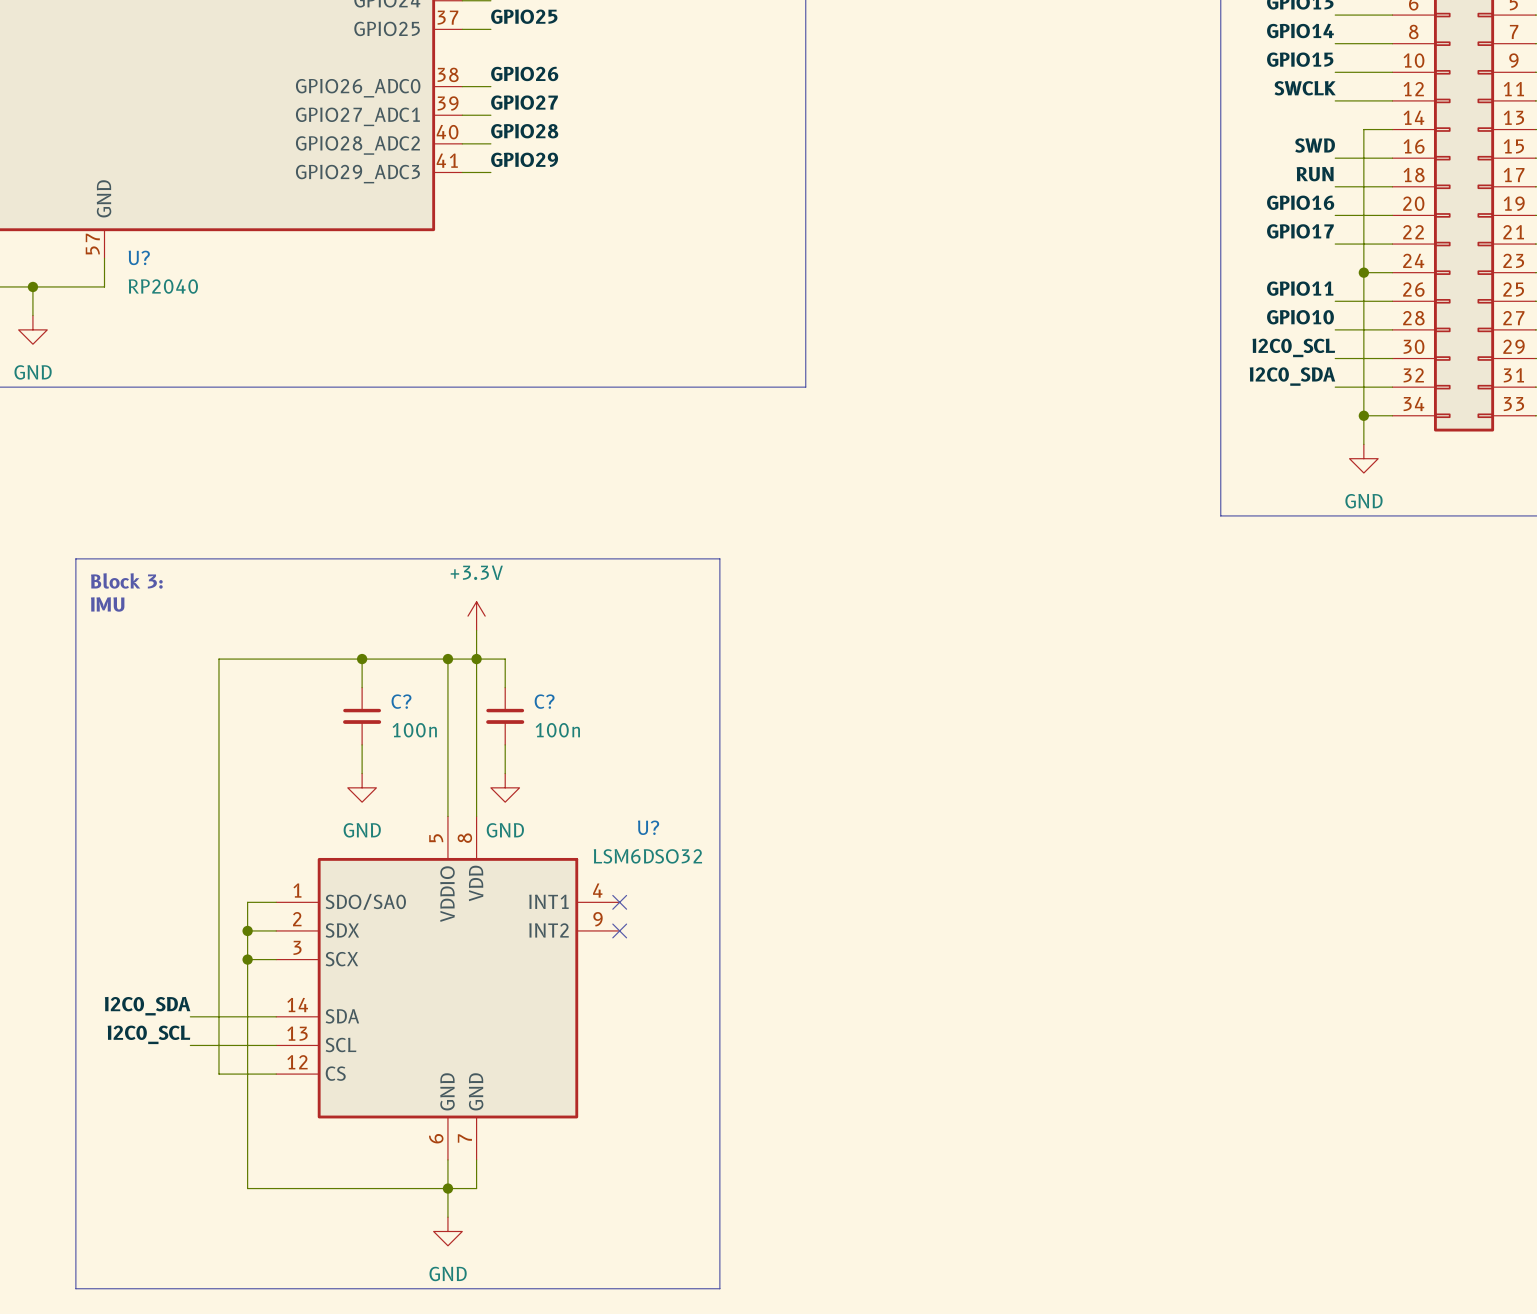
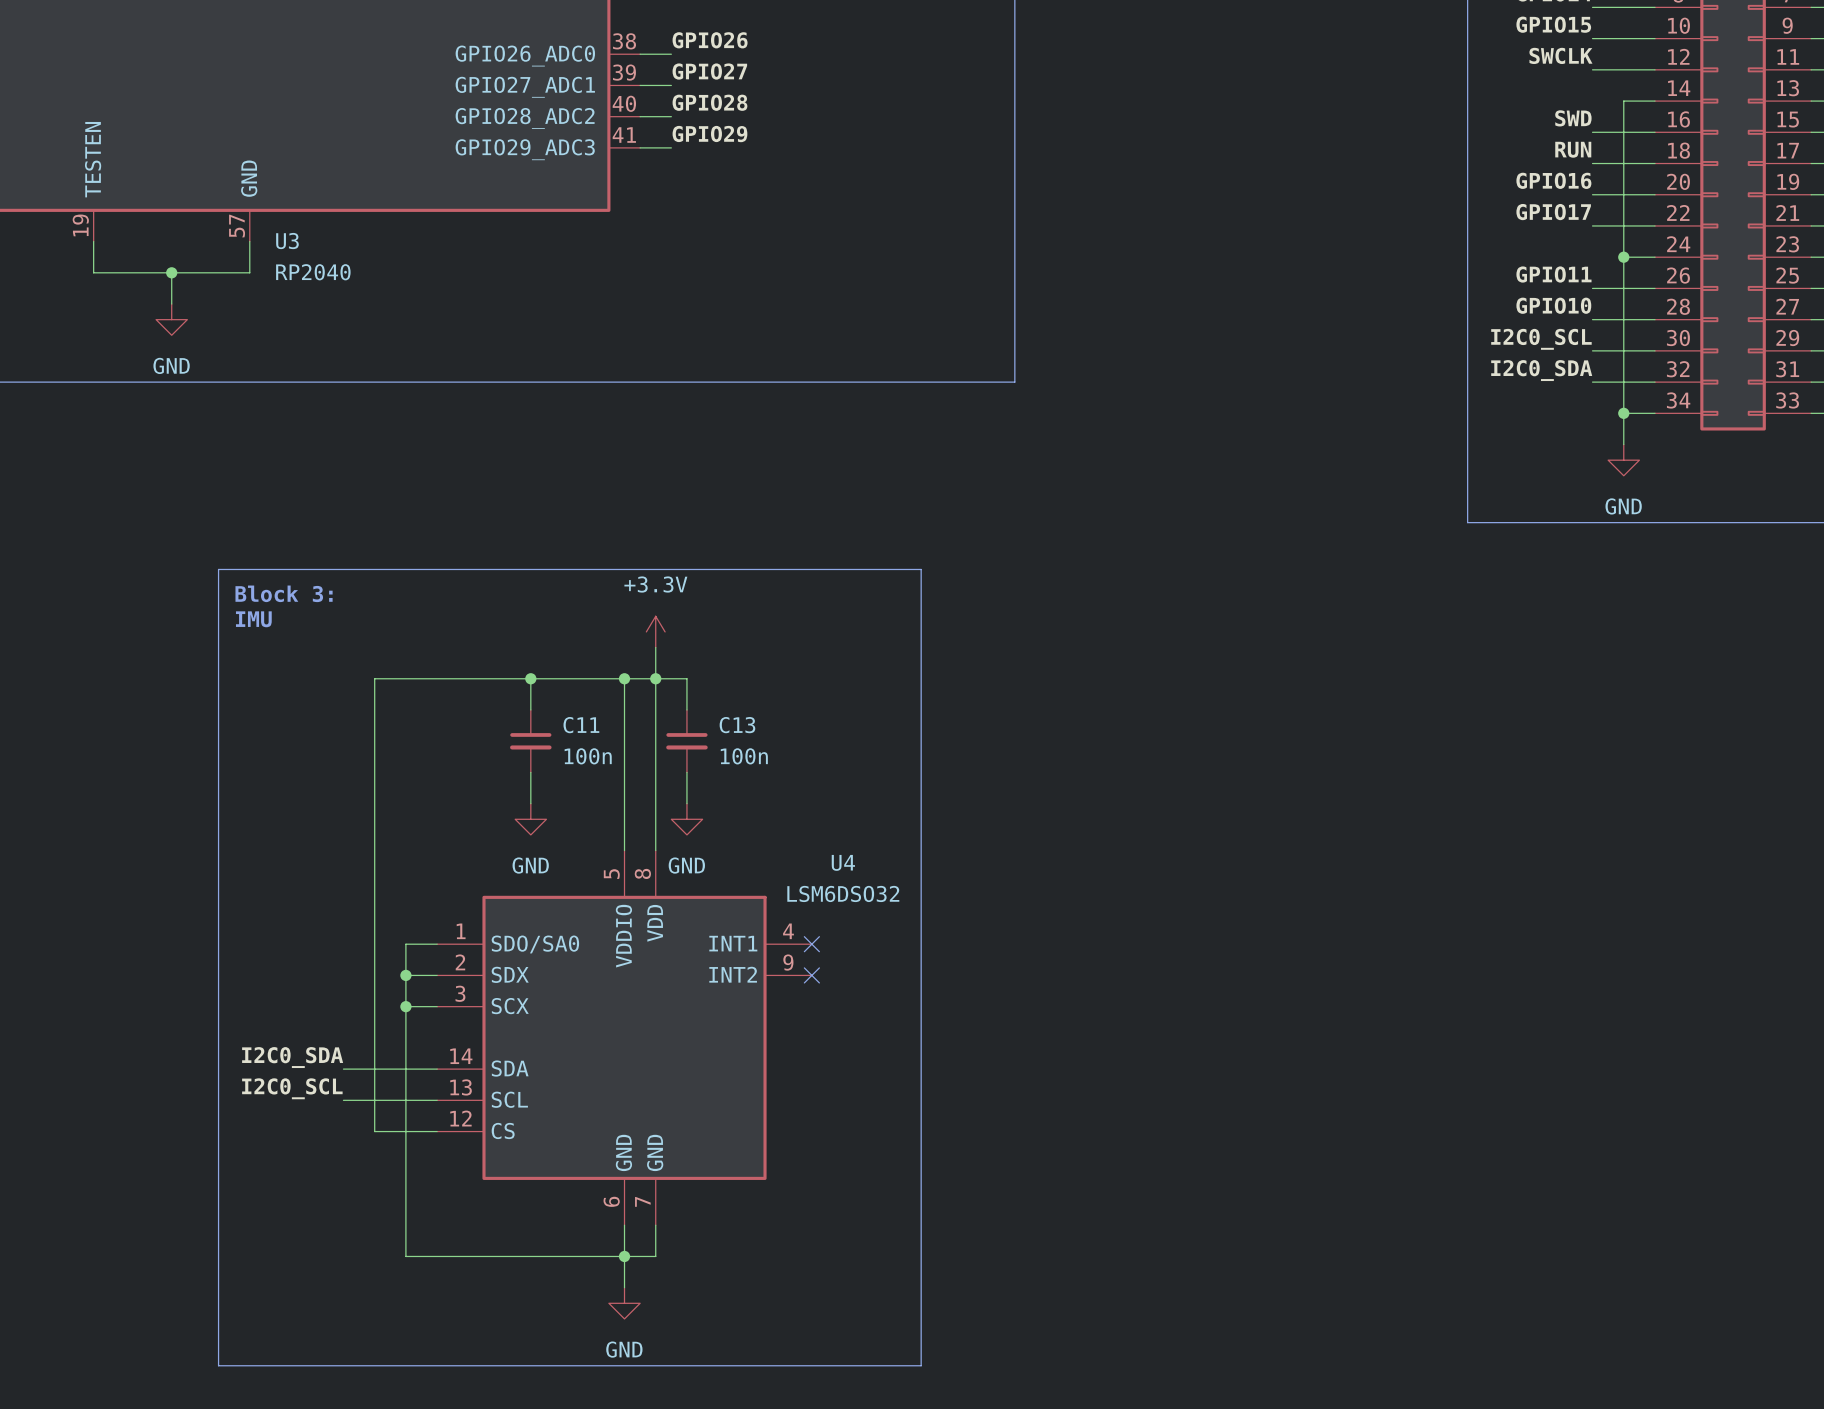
U? name: U? (139, 257) -> U3 (287, 241)
C? name: C? (401, 701) -> C11 (581, 725)
C? name: C? (544, 701) -> C13 (737, 725)
U? name: U? (648, 827) -> U4 (843, 862)

